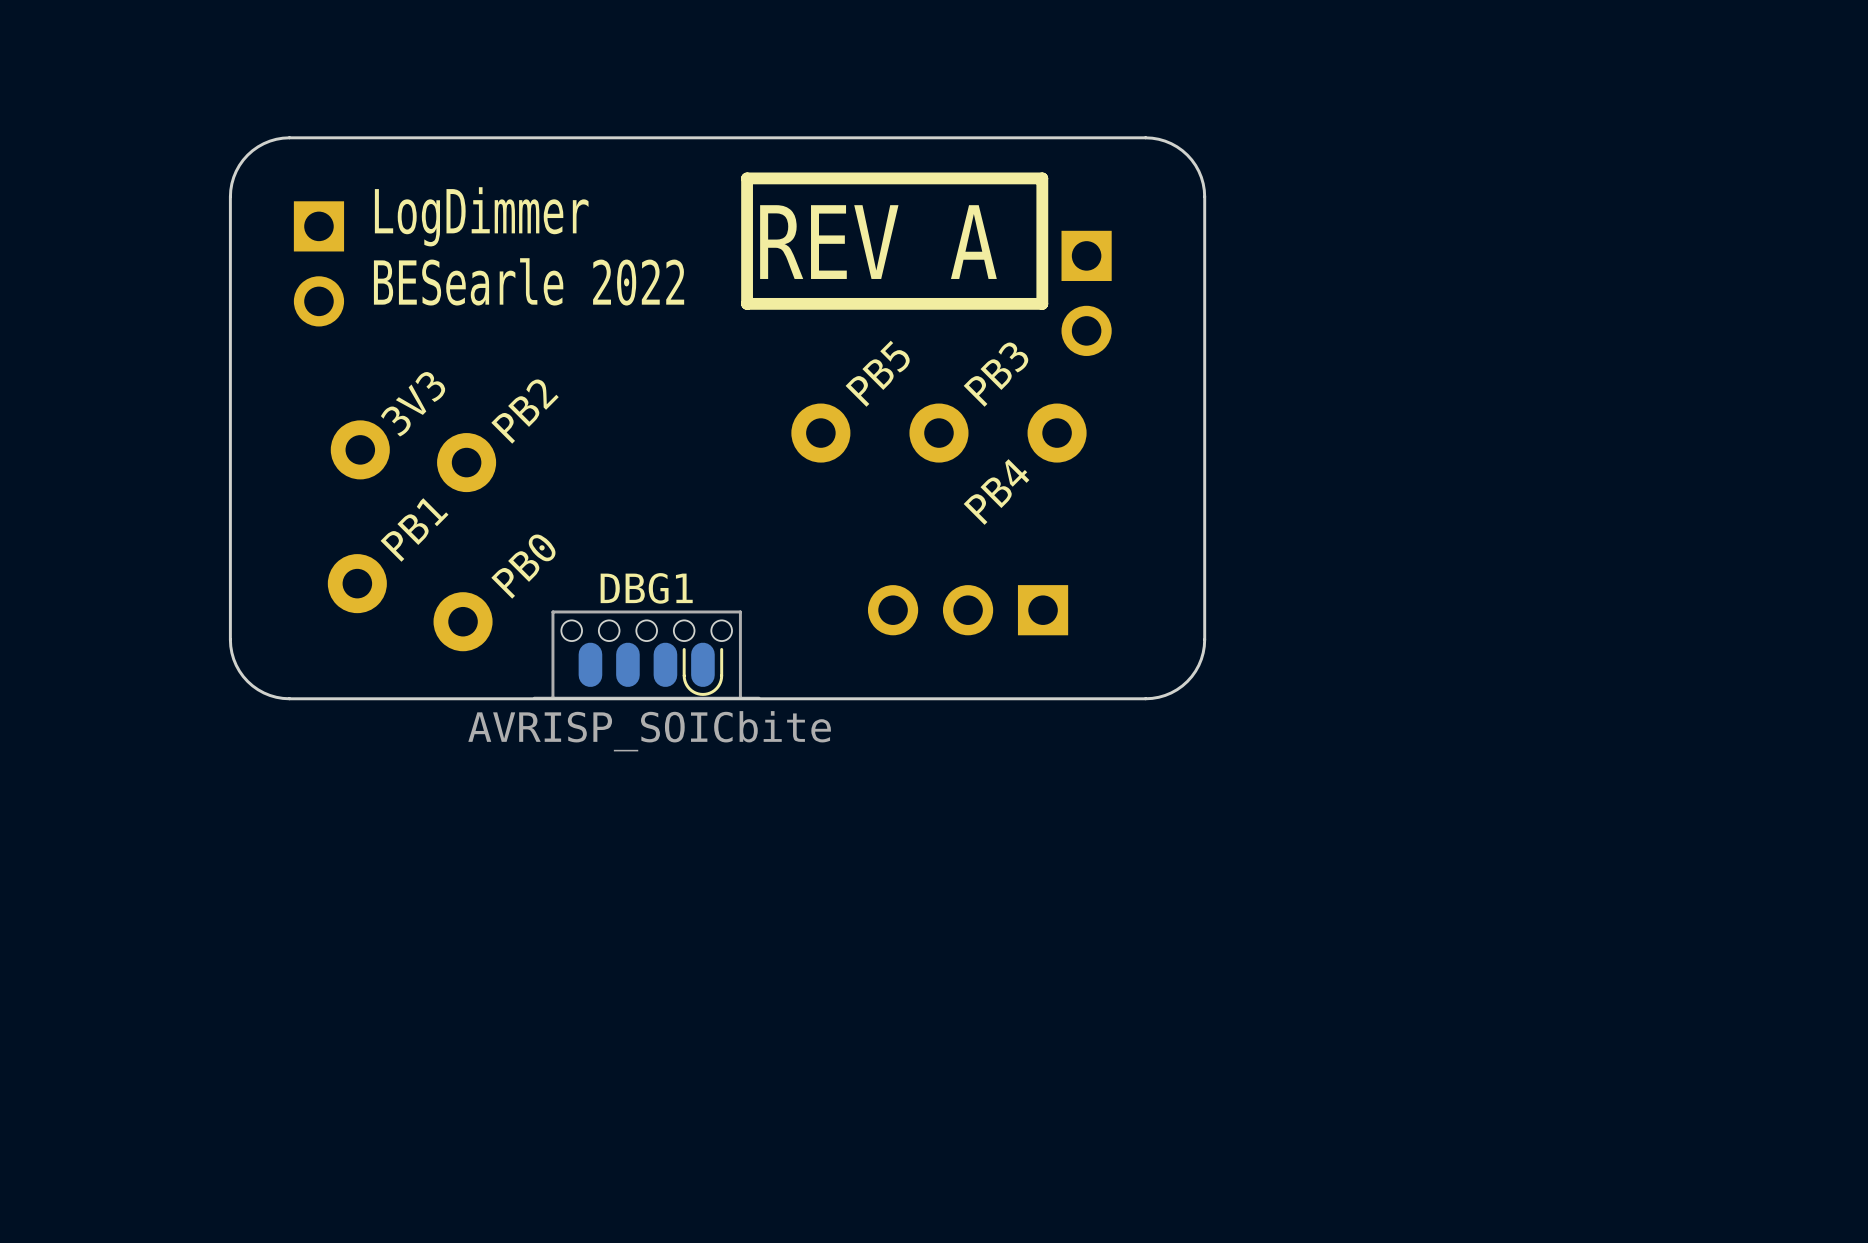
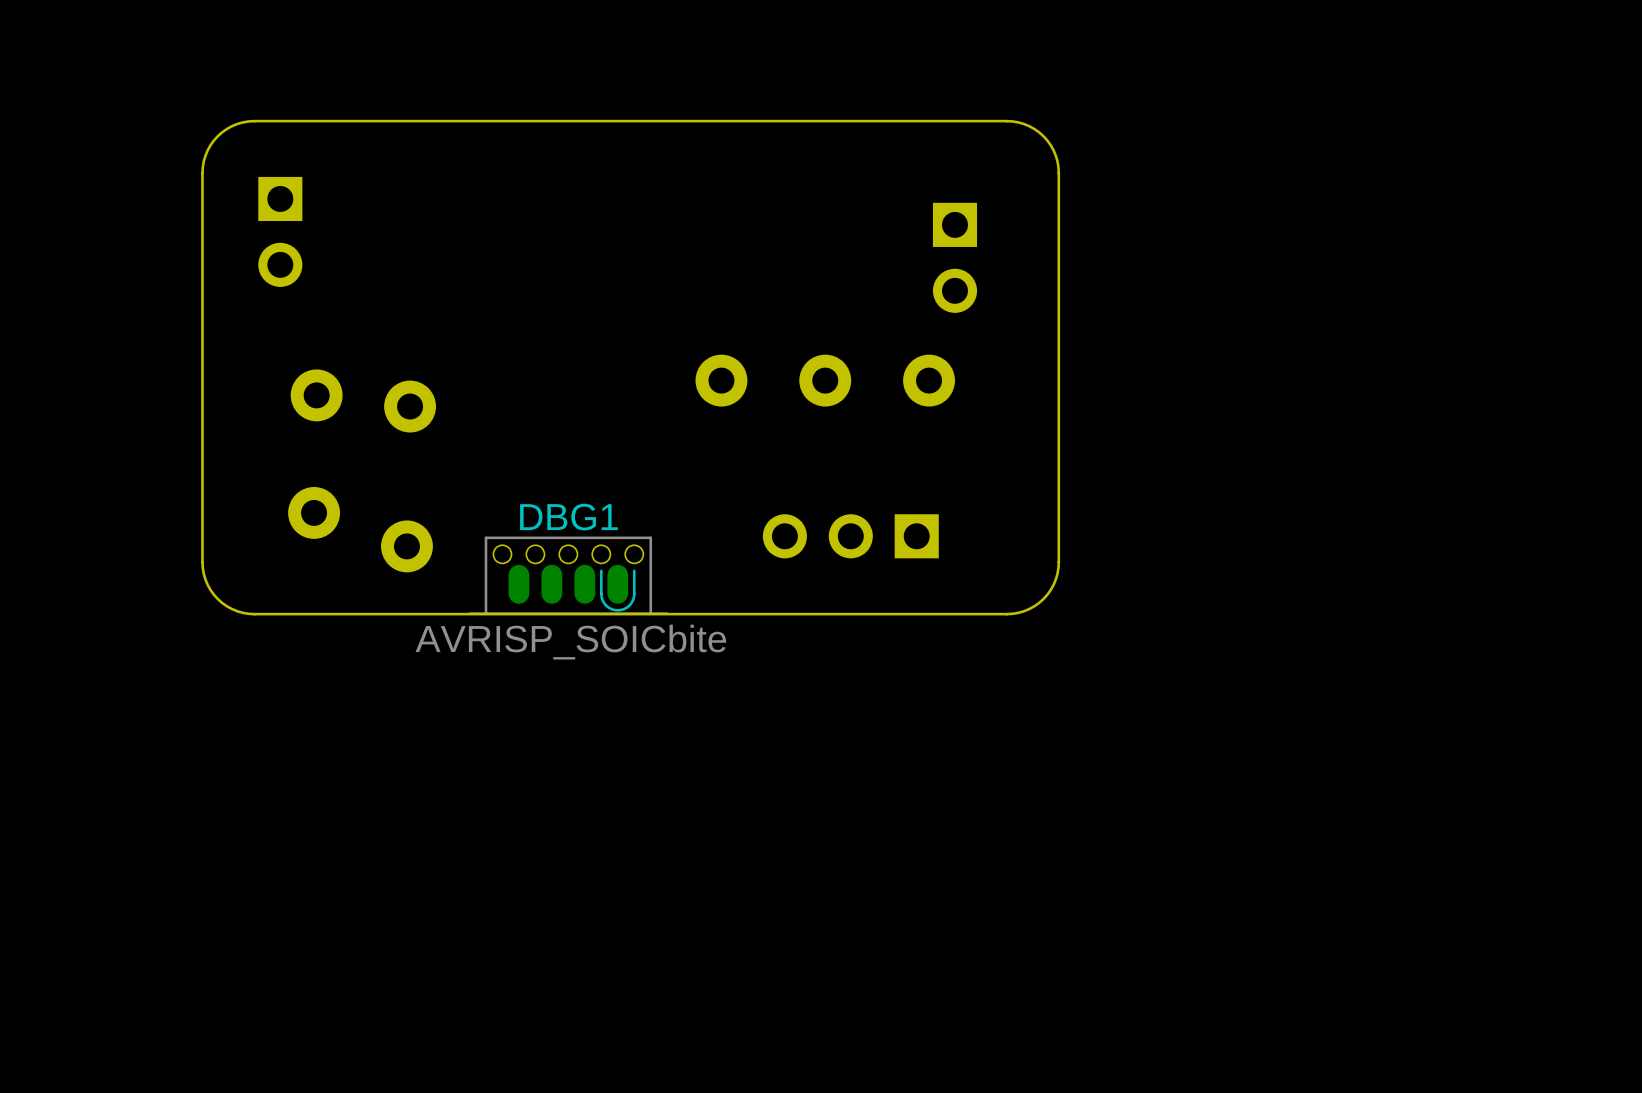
line: (1042, 178) (1042, 303) (747, 303) (747, 178) (1042, 178) -> none
text: LogDimmer (481, 216) -> none
text: REV A (878, 242) -> none
text: BESearle 2022 (529, 281) -> none
part value: PB5 (877, 373) -> none
part value: PB3 (996, 374) -> none
part value: 3V3 (413, 404) -> none
part value: PB2 (525, 411) -> none
part value: PB4 (996, 492) -> none
part value: PB1 (414, 529) -> none
part value: PB0 (523, 566) -> none

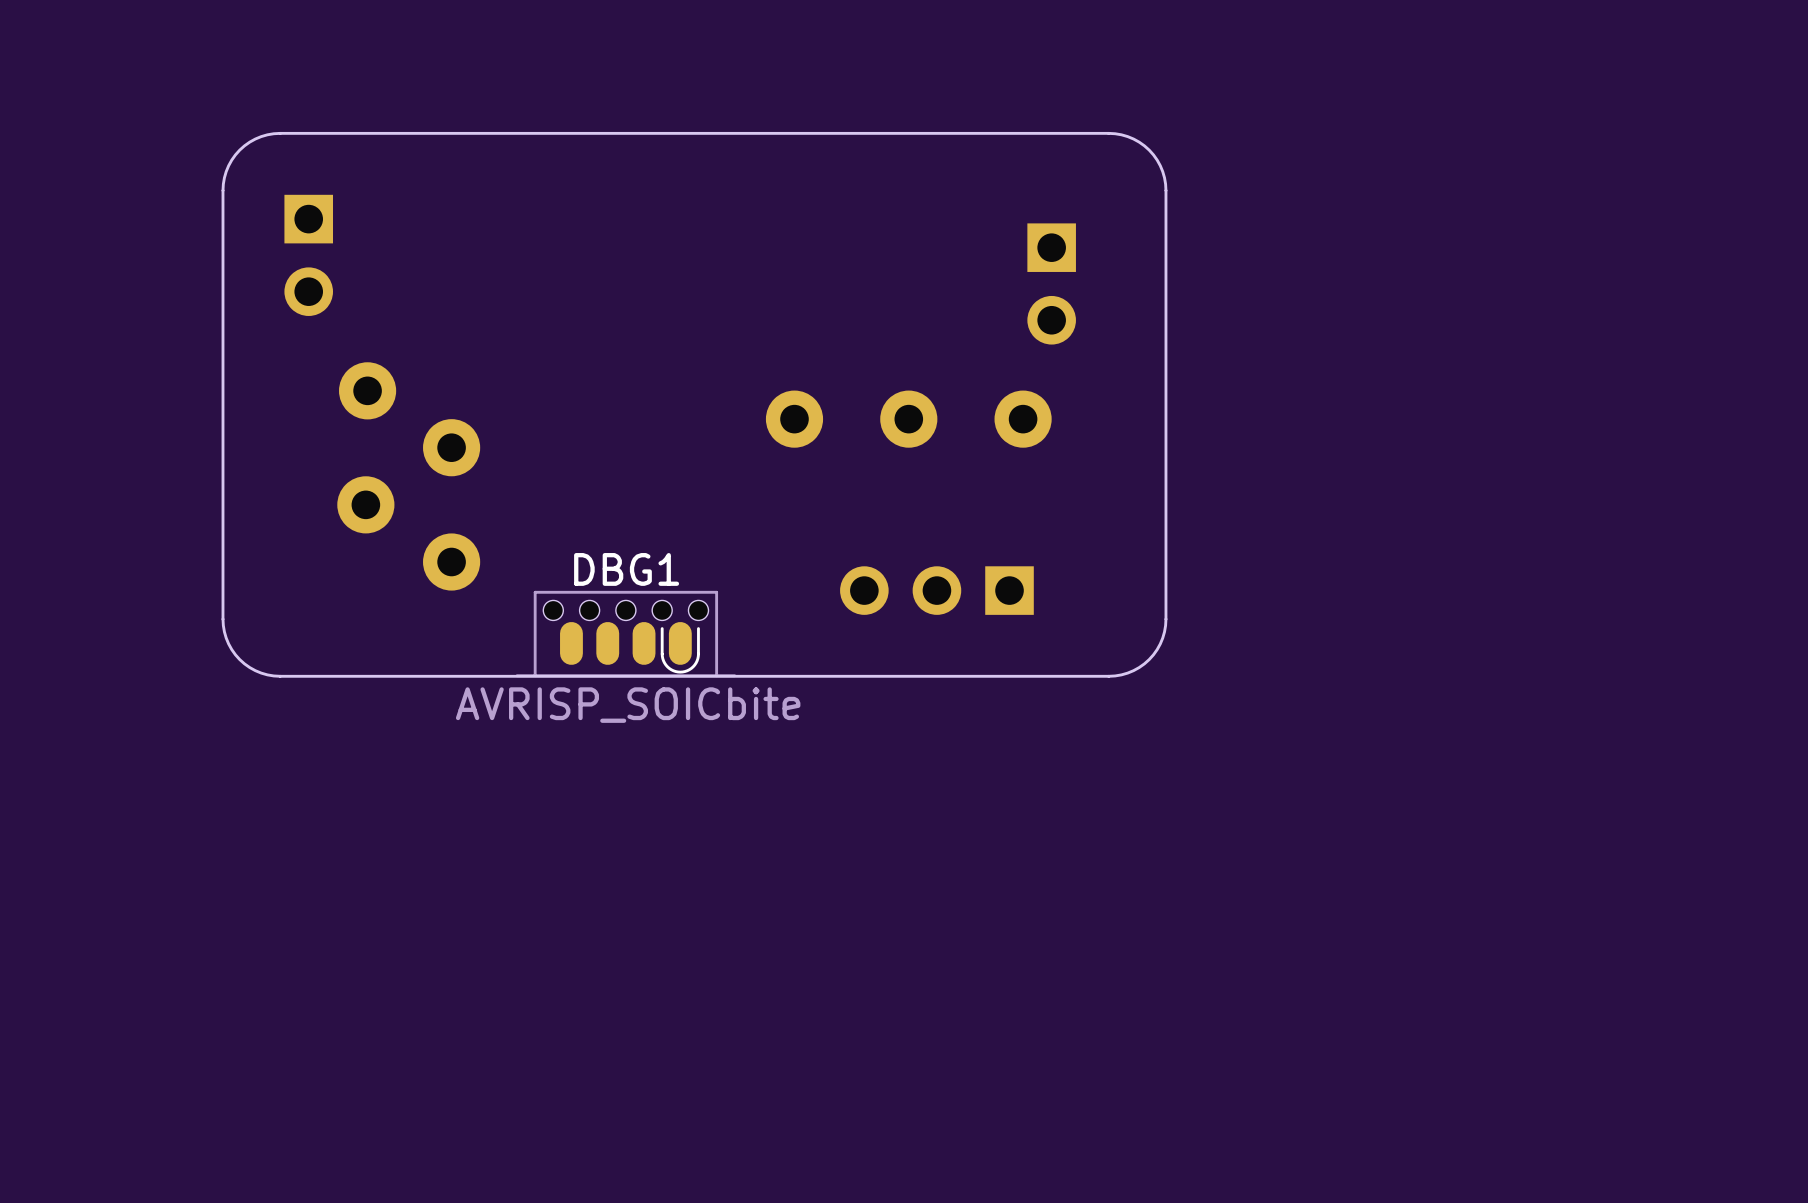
part: none -> (367, 390)
part: (316, 395) -> none
part: none -> (365, 504)
part: (314, 512) -> none
part position: (406, 546) -> (451, 562)

